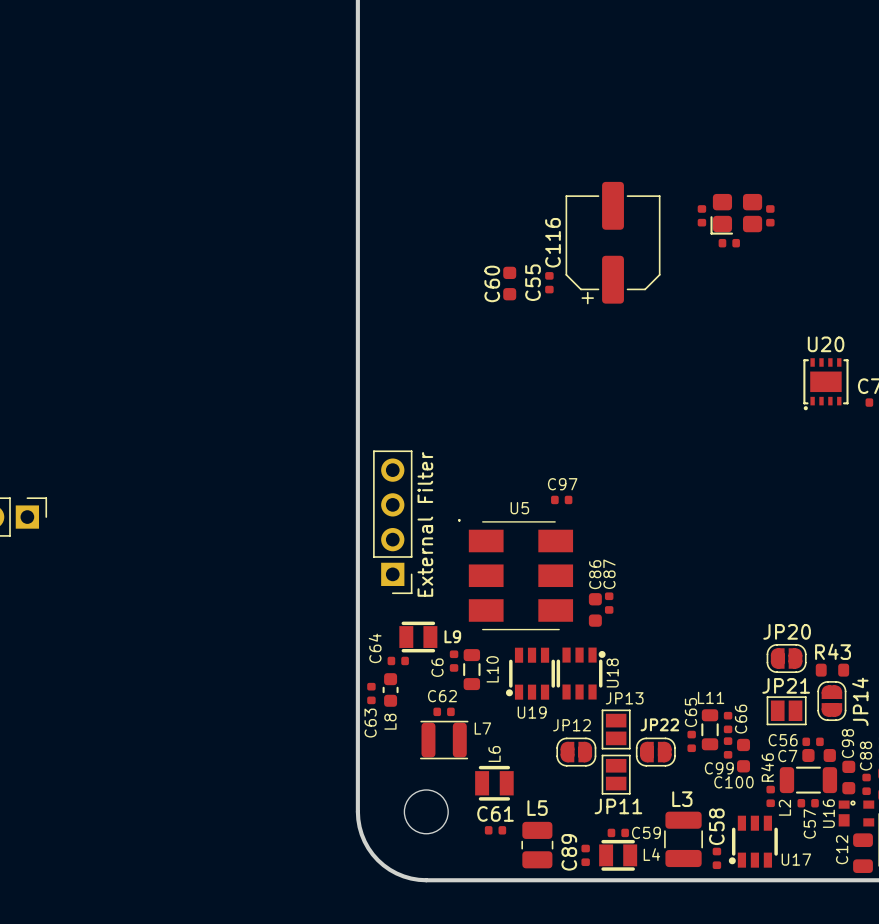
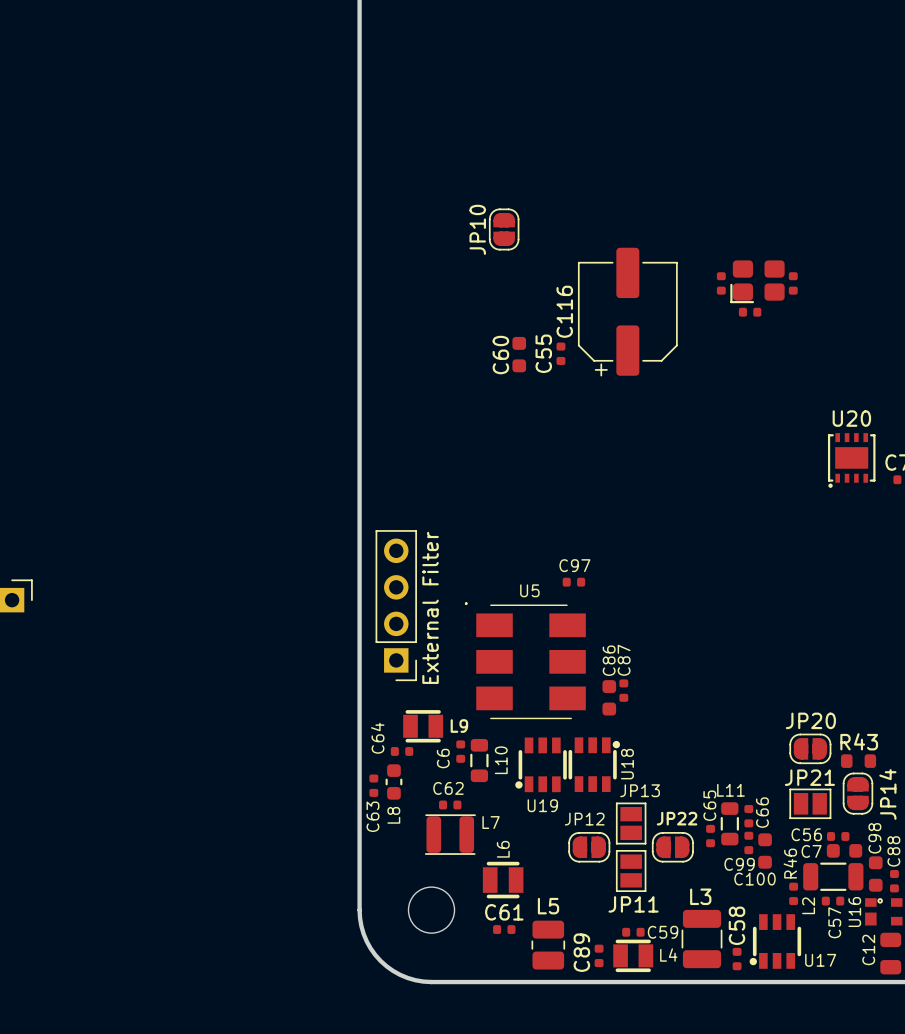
JP10: none -> (504, 229)

